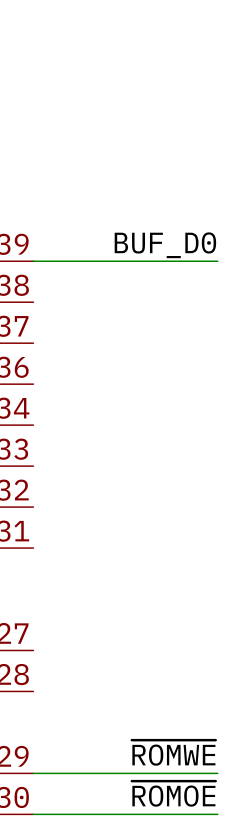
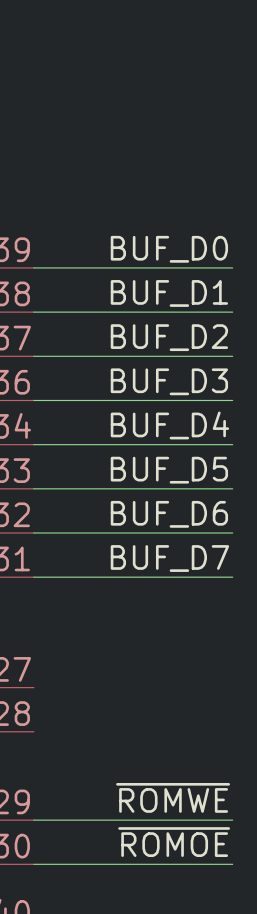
label: none -> BUF_D1 (169, 293)
wire: none -> (33, 312) (232, 312)
label: none -> BUF_D2 (169, 337)
wire: none -> (33, 356) (232, 356)
label: none -> BUF_D3 (169, 381)
wire: none -> (33, 400) (232, 400)
label: none -> BUF_D4 (169, 425)
wire: none -> (33, 444) (232, 444)
label: none -> BUF_D5 (169, 470)
wire: none -> (33, 488) (232, 488)
label: none -> BUF_D6 (169, 514)
wire: none -> (33, 533) (232, 533)
label: none -> BUF_D7 (169, 558)
wire: none -> (33, 577) (232, 577)

